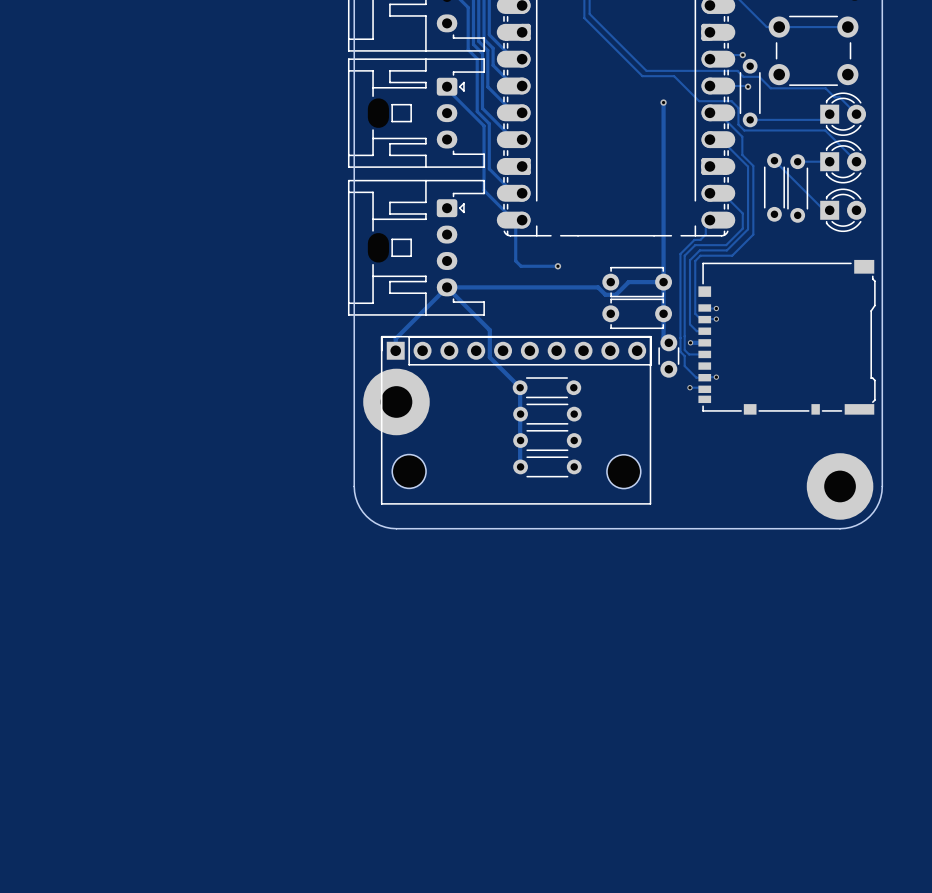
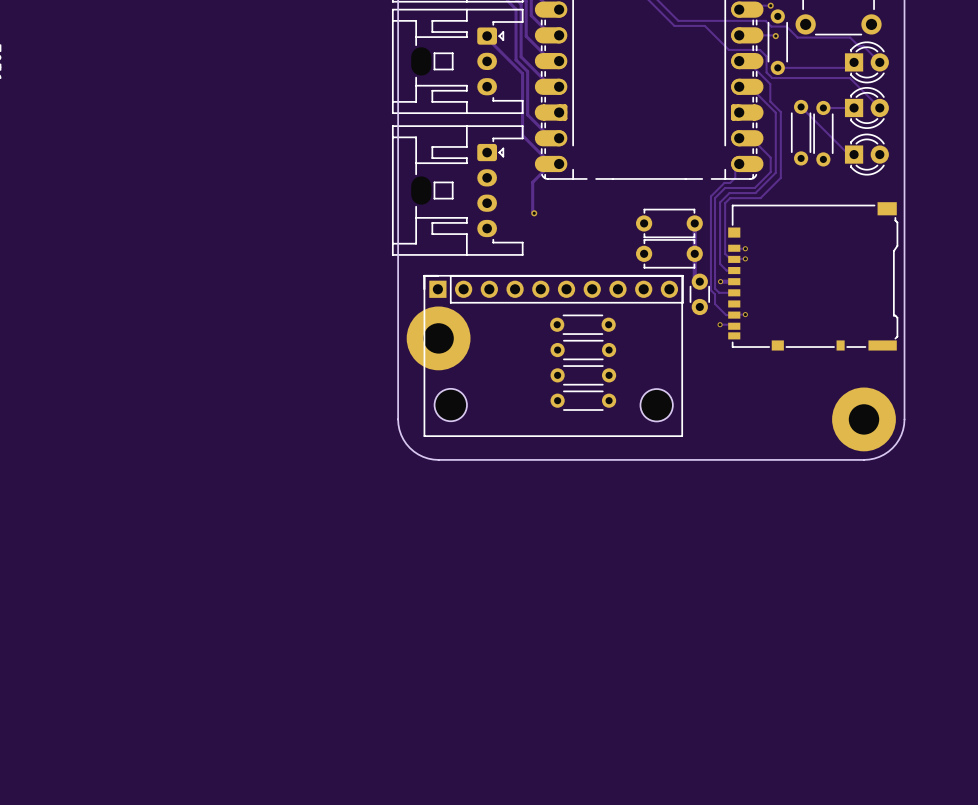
track: (663, 102) (663, 282) (628, 282) (616, 294) (605, 294) (598, 287) (447, 287) -> none
via: (663, 102) -> none
track: (513, 220) (515, 222) (515, 260) (521, 266) (557, 266) -> (551, 163) (532, 182) (534, 213)
via position: (557, 266) -> (534, 213)
track: (447, 287) (395, 338) (395, 350) -> none
track: (447, 287) (489, 330) (489, 357) (520, 387) (520, 466) -> none

